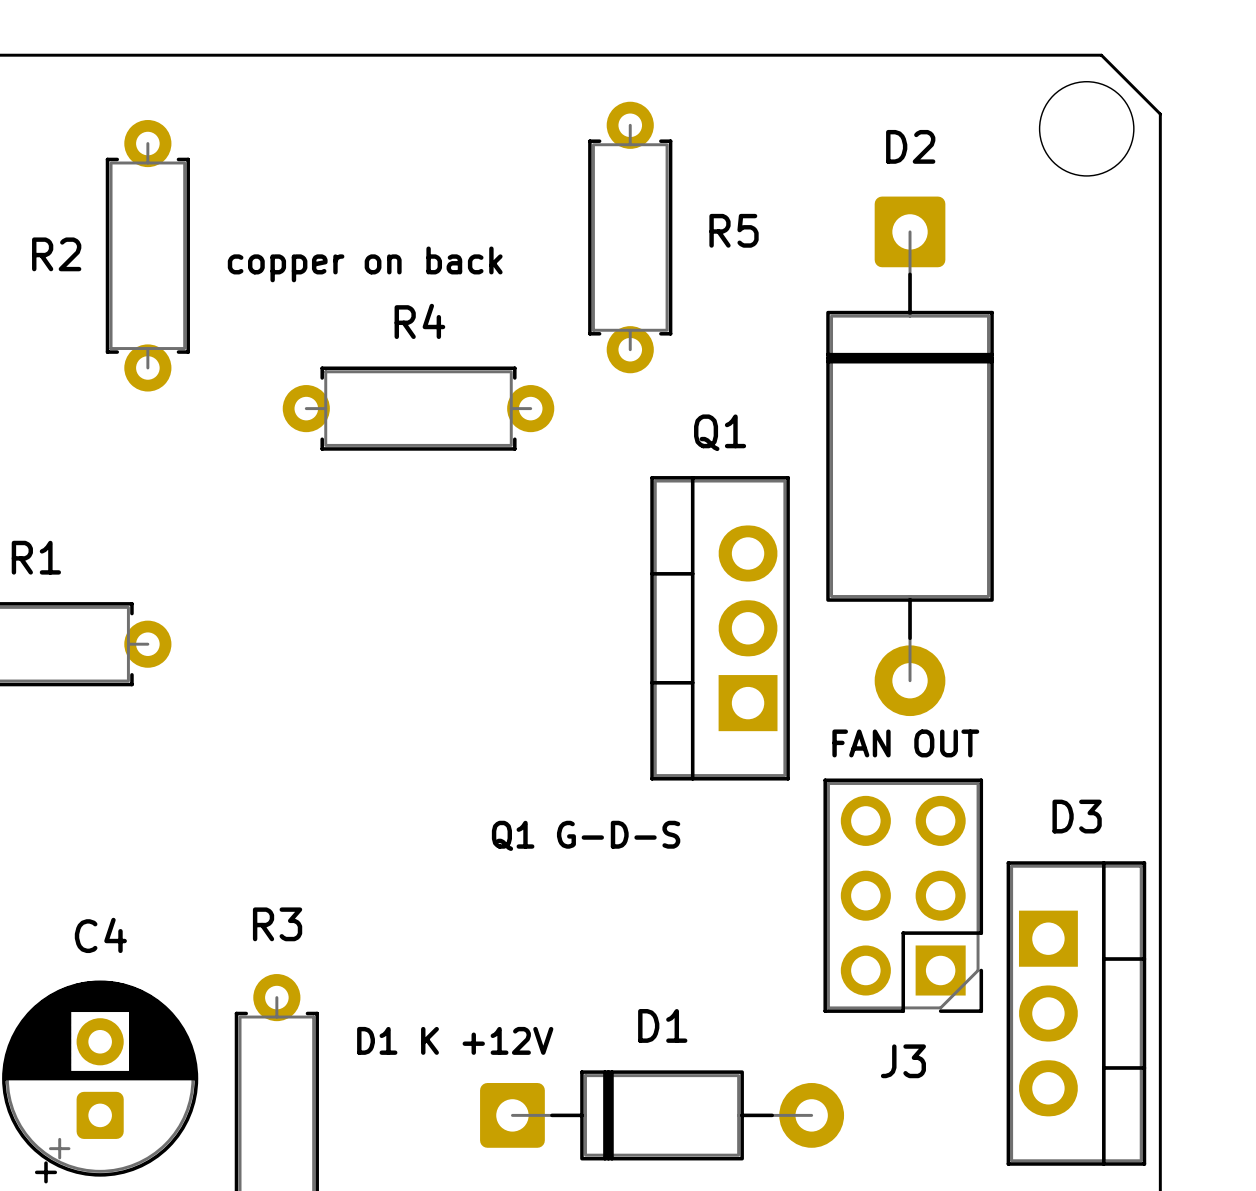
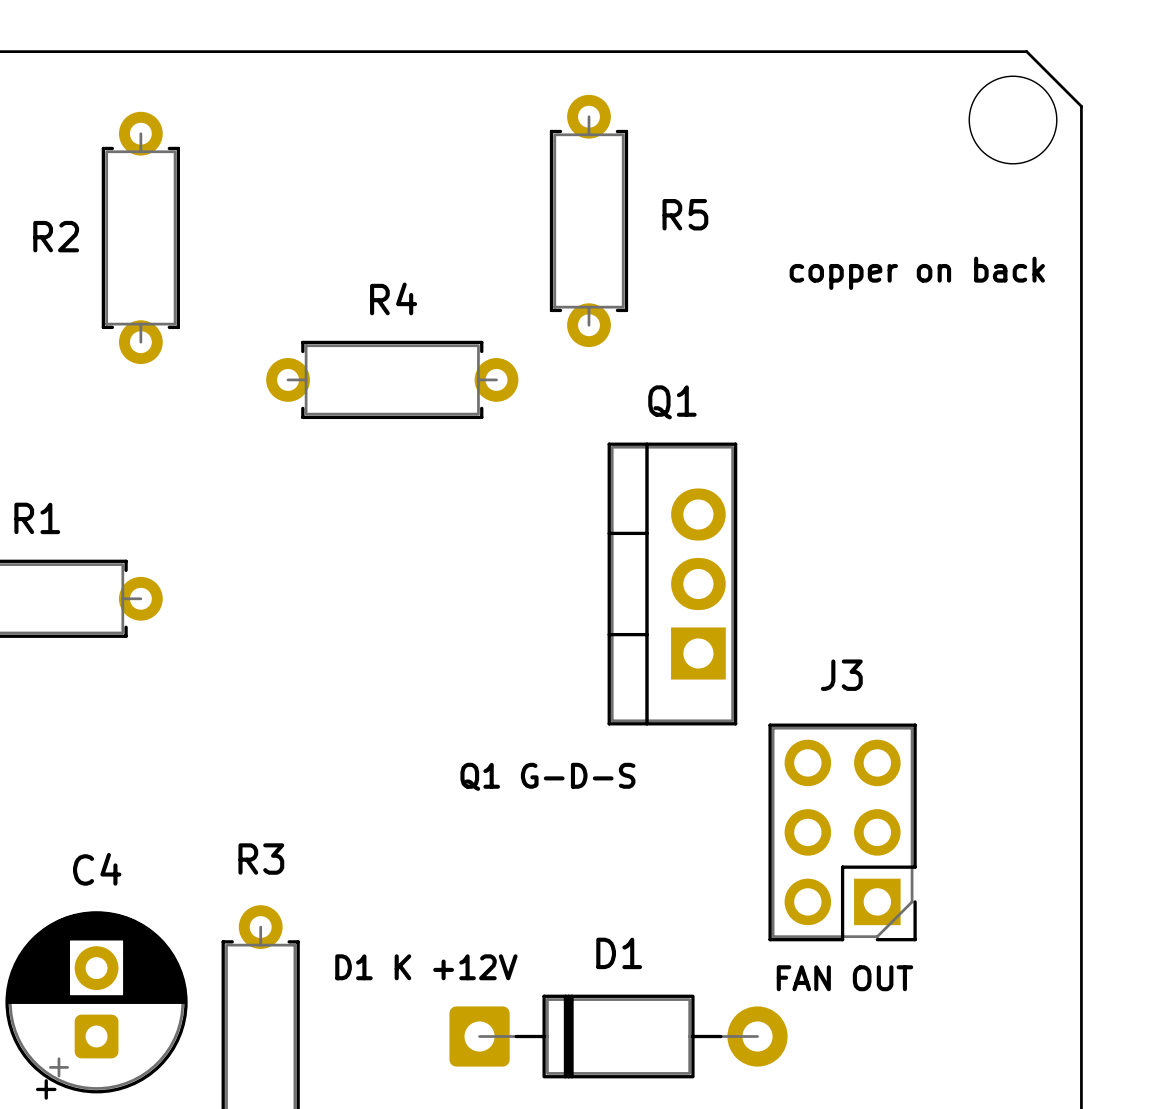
text position: copper on back (365, 264) -> copper on back (917, 273)
D2: (910, 456) -> none
text position: FAN OUT (905, 743) -> FAN OUT (844, 978)
D3: (1076, 1013) -> none
J3 name position: J3 (903, 1061) -> J3 (841, 675)

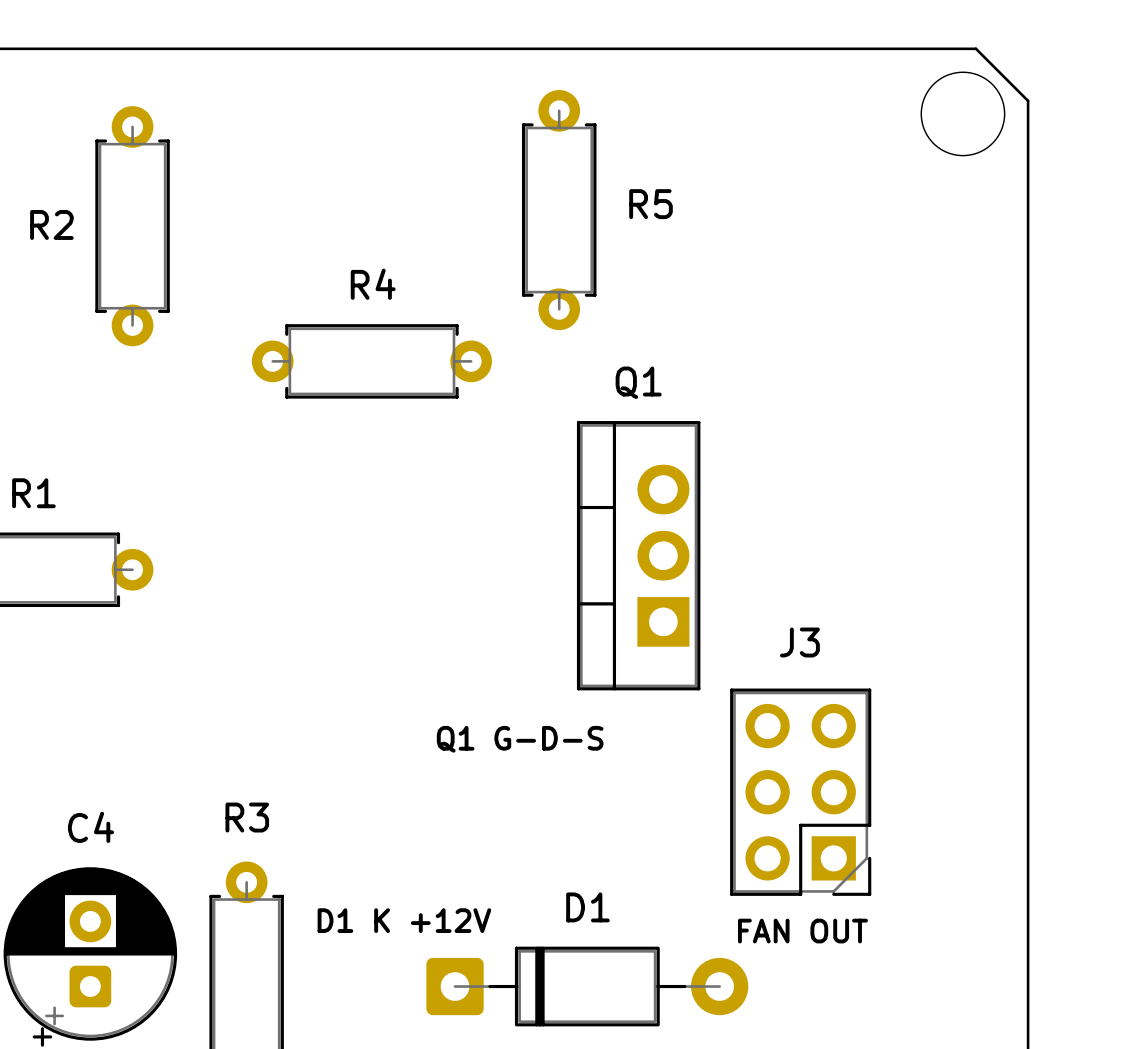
text: copper on back (917, 273) -> none

